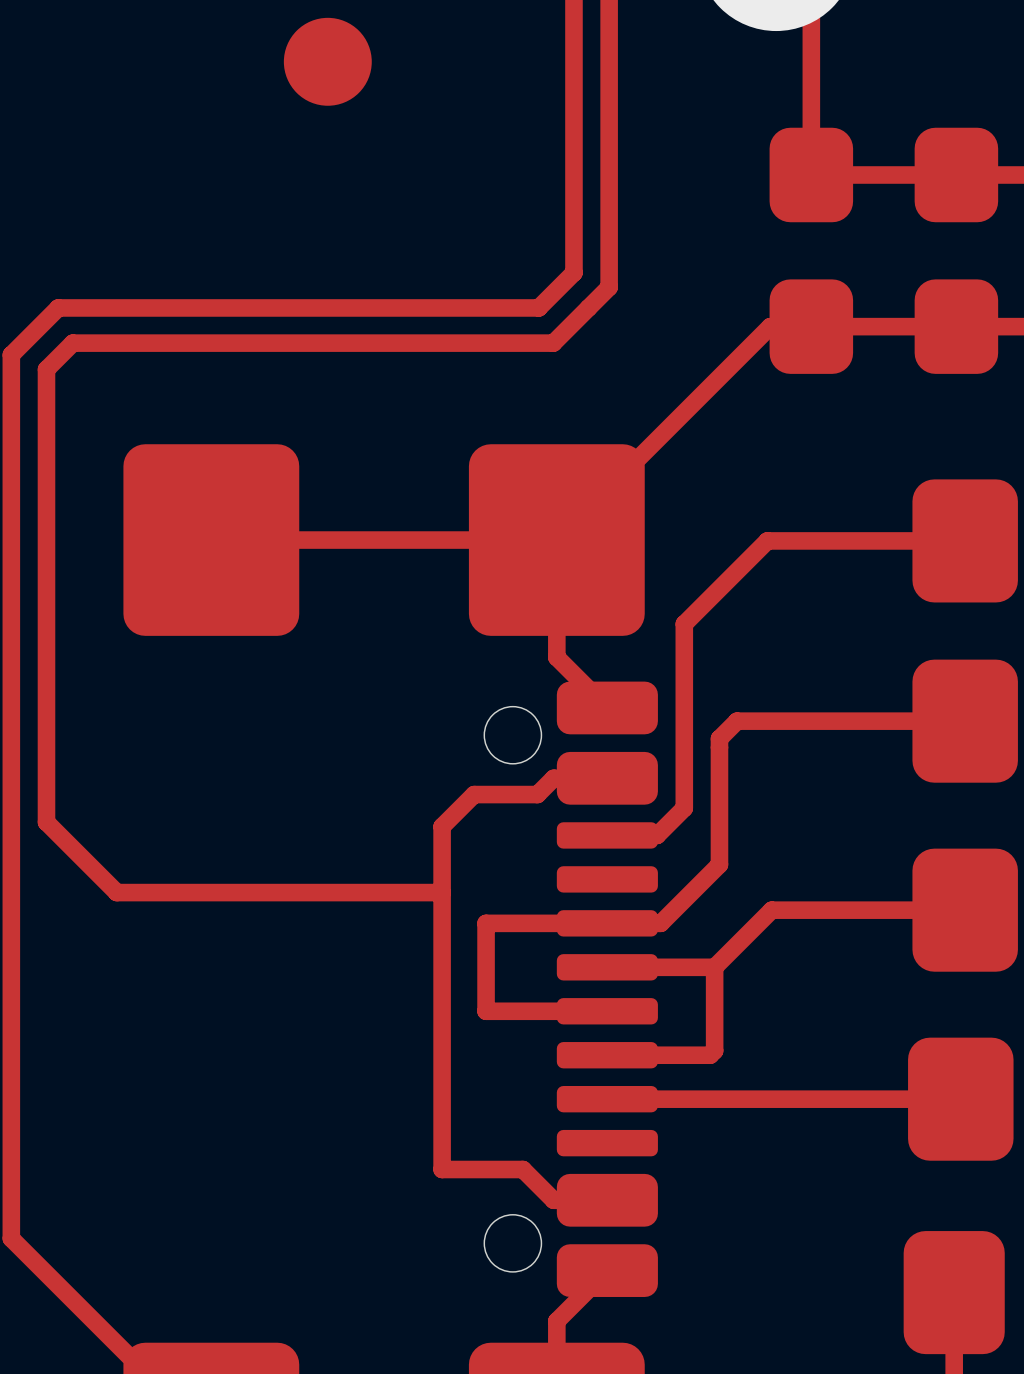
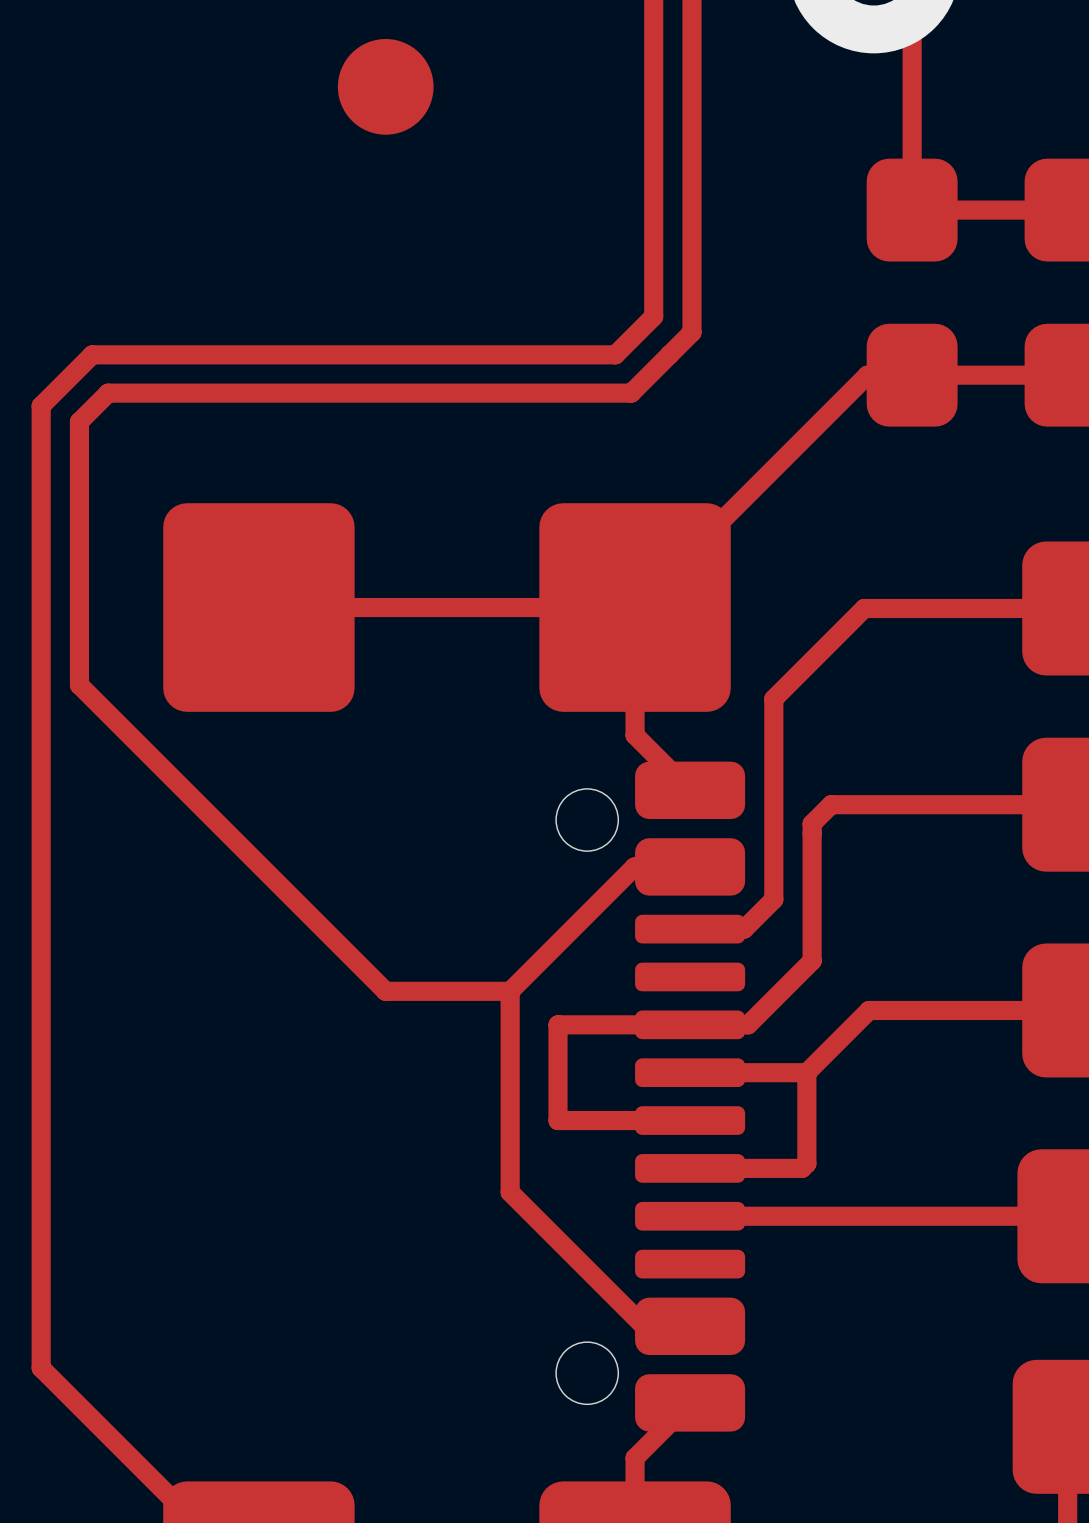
top track: (46, 611) (46, 822) (116, 892) (327, 892) -> (79, 685) (385, 991)
top track: (556, 778) (553, 778) (537, 794) (474, 794) (442, 826) (442, 892) -> (634, 866) (510, 991)
top track: (442, 1077) (442, 1169) (522, 1169) (553, 1200) (565, 1200) -> (510, 1192) (644, 1326)

